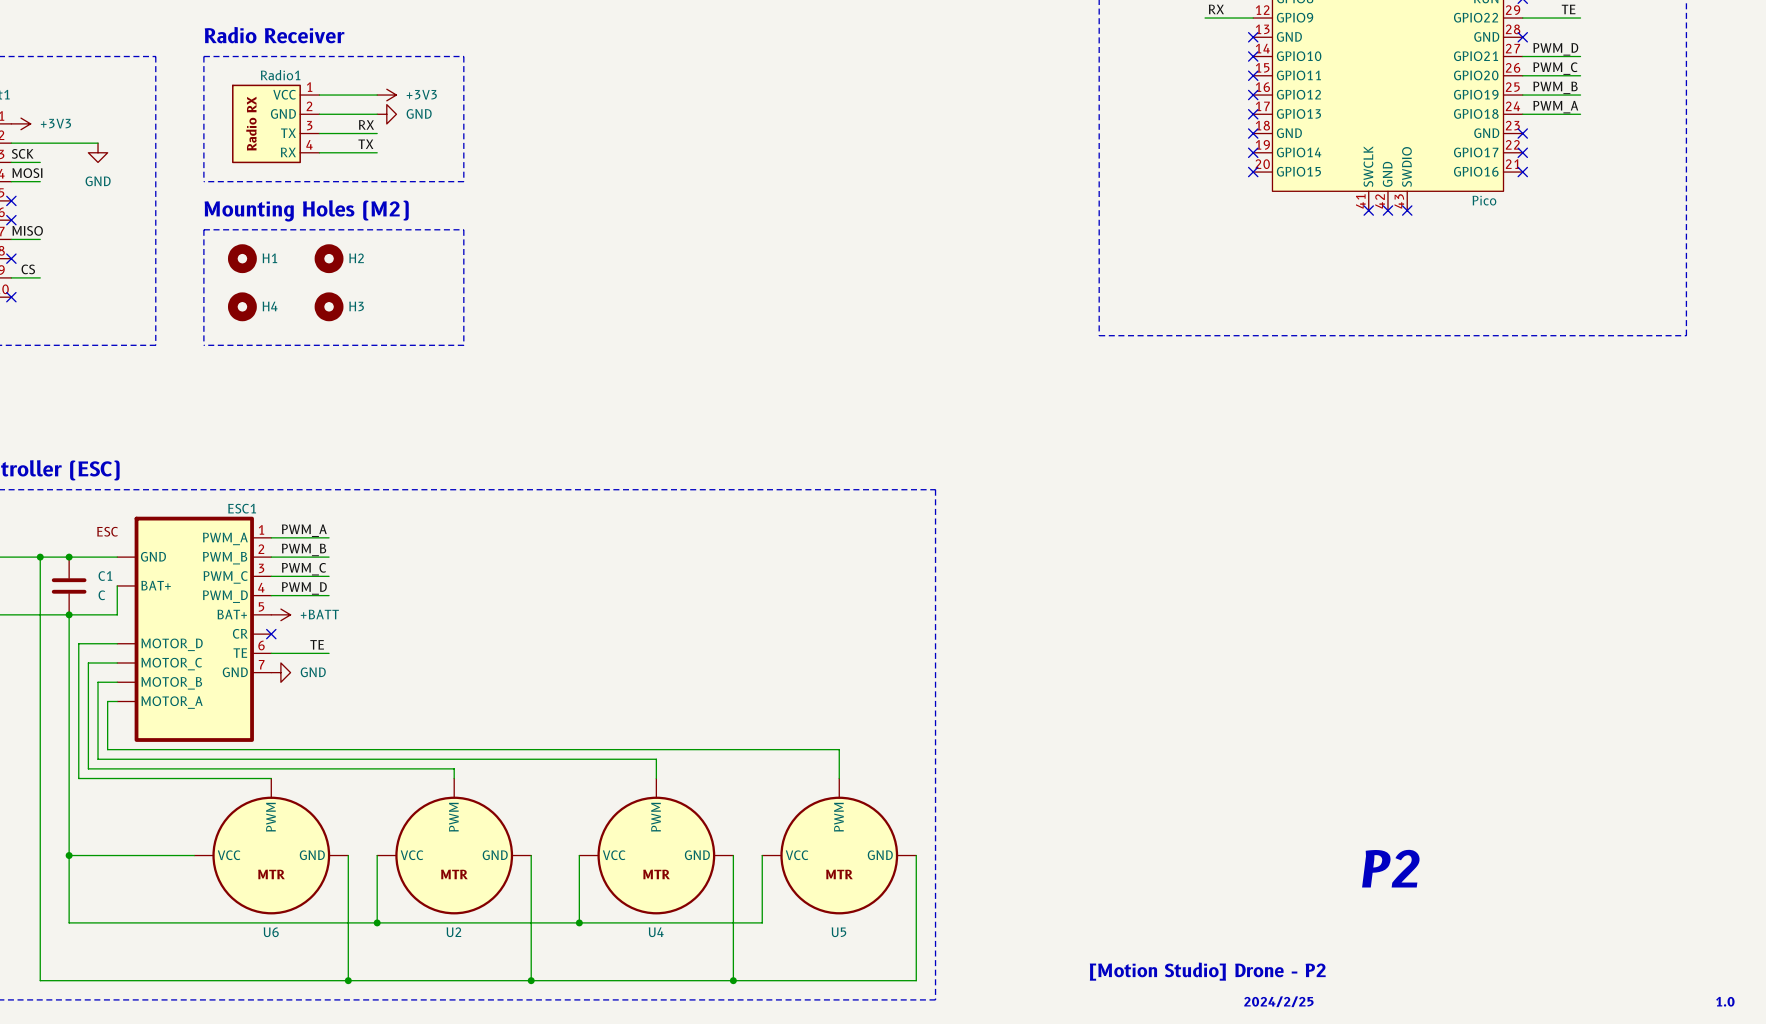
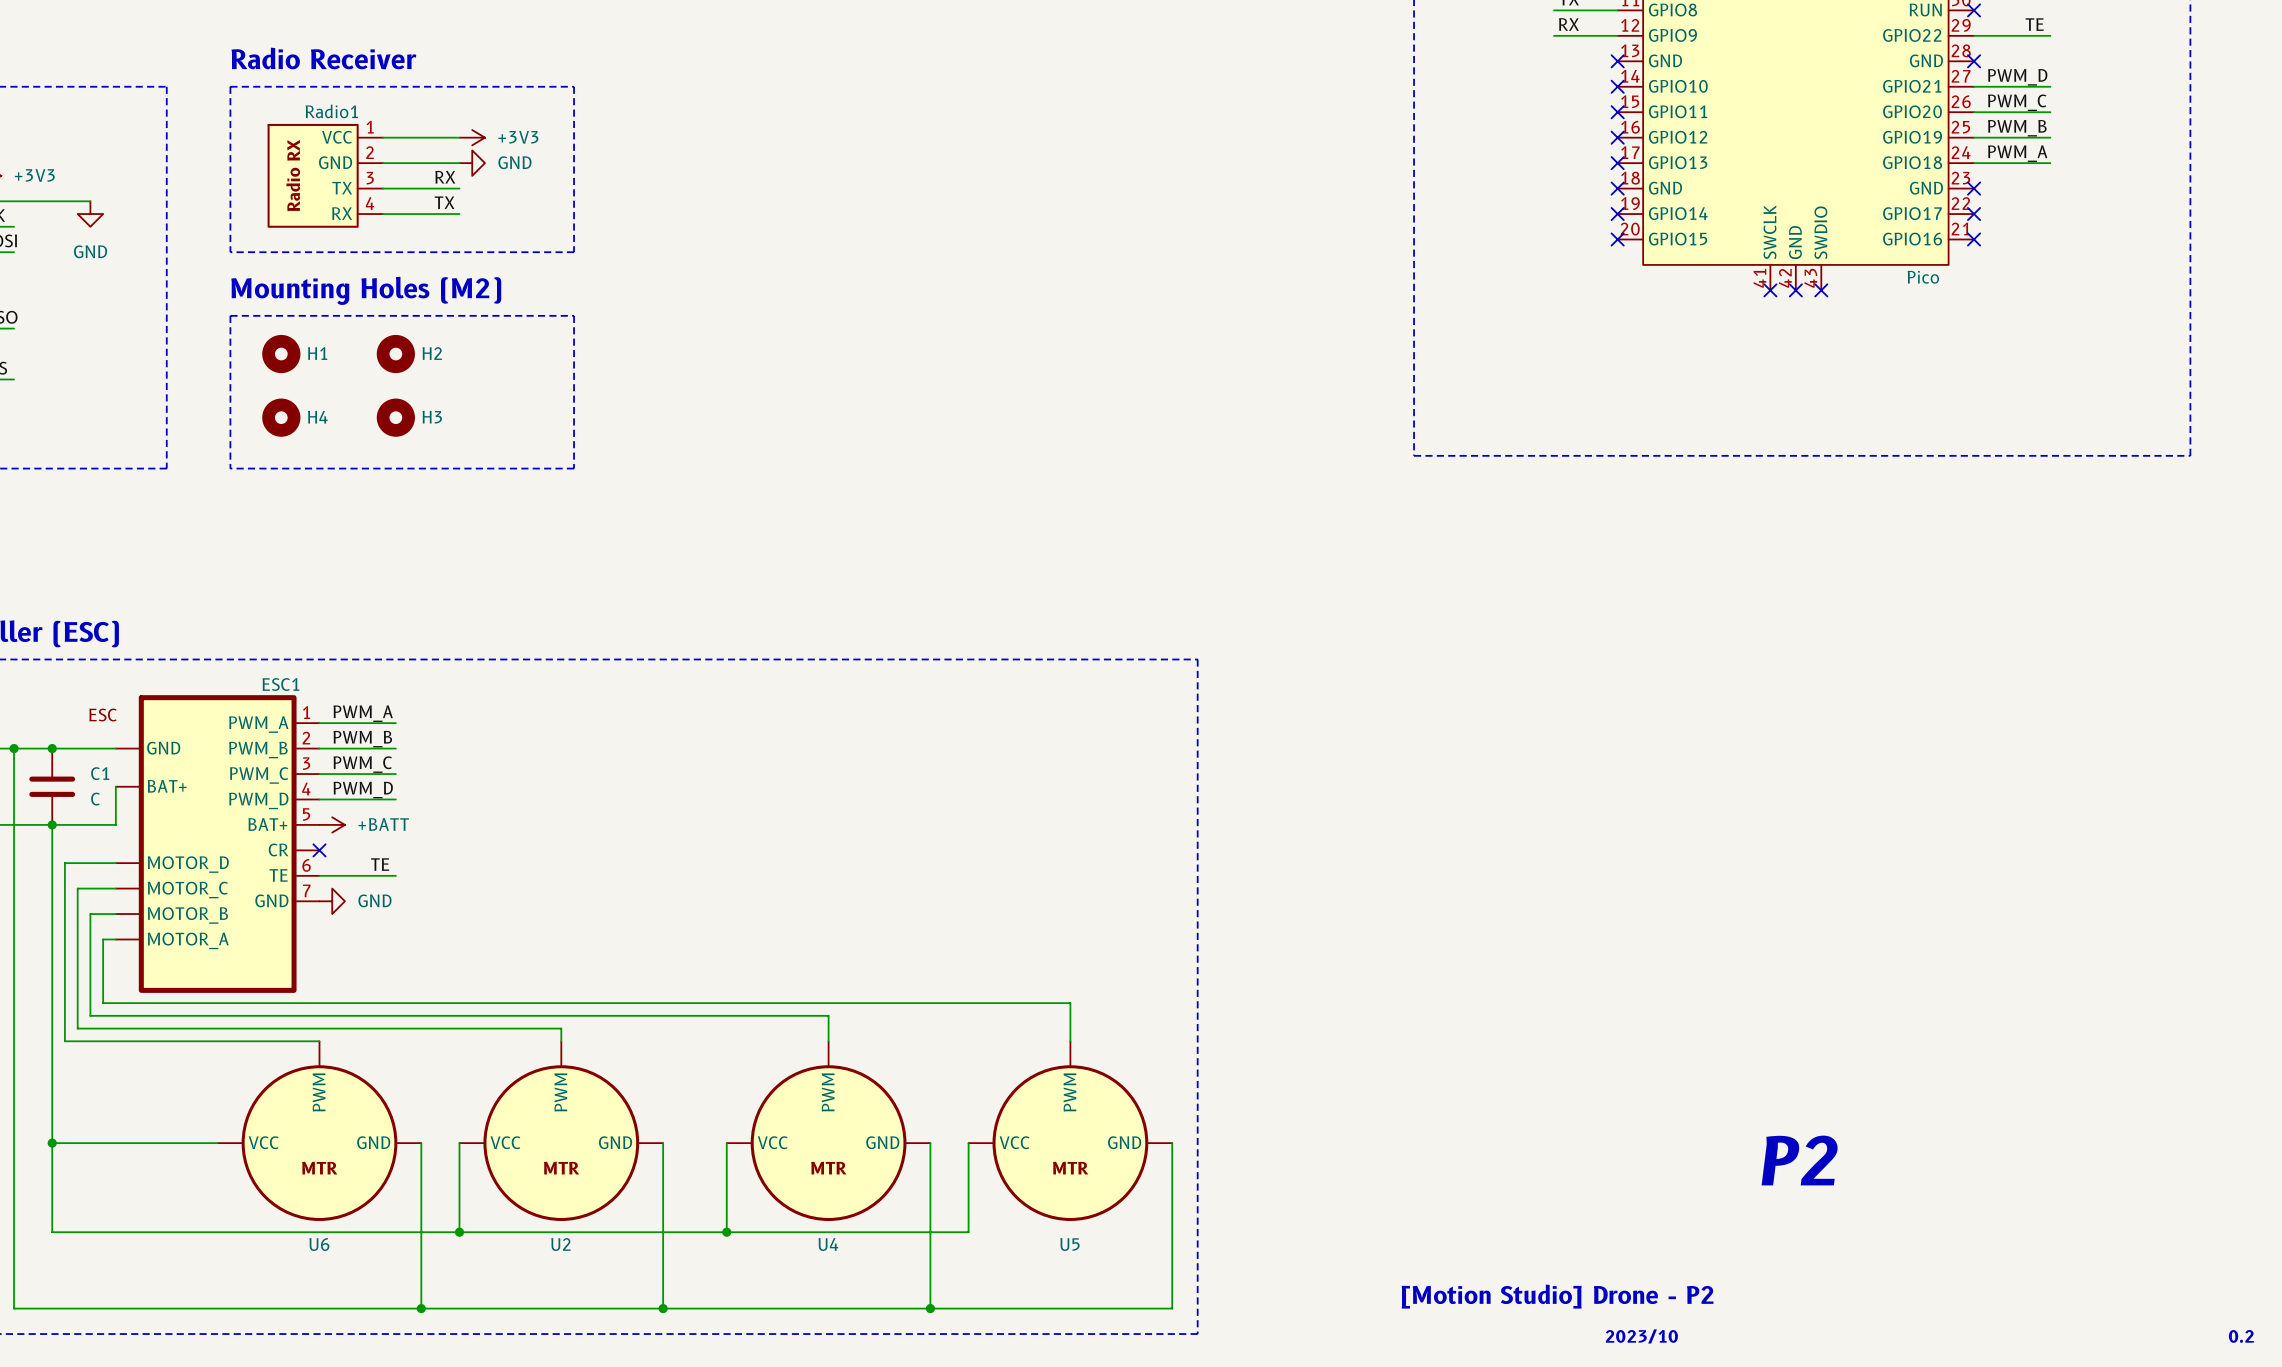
text: 2024/2/25 (1278, 1001) -> 2023/10 (1641, 1336)
text: 1.0 (1725, 1001) -> 0.2 (2241, 1336)

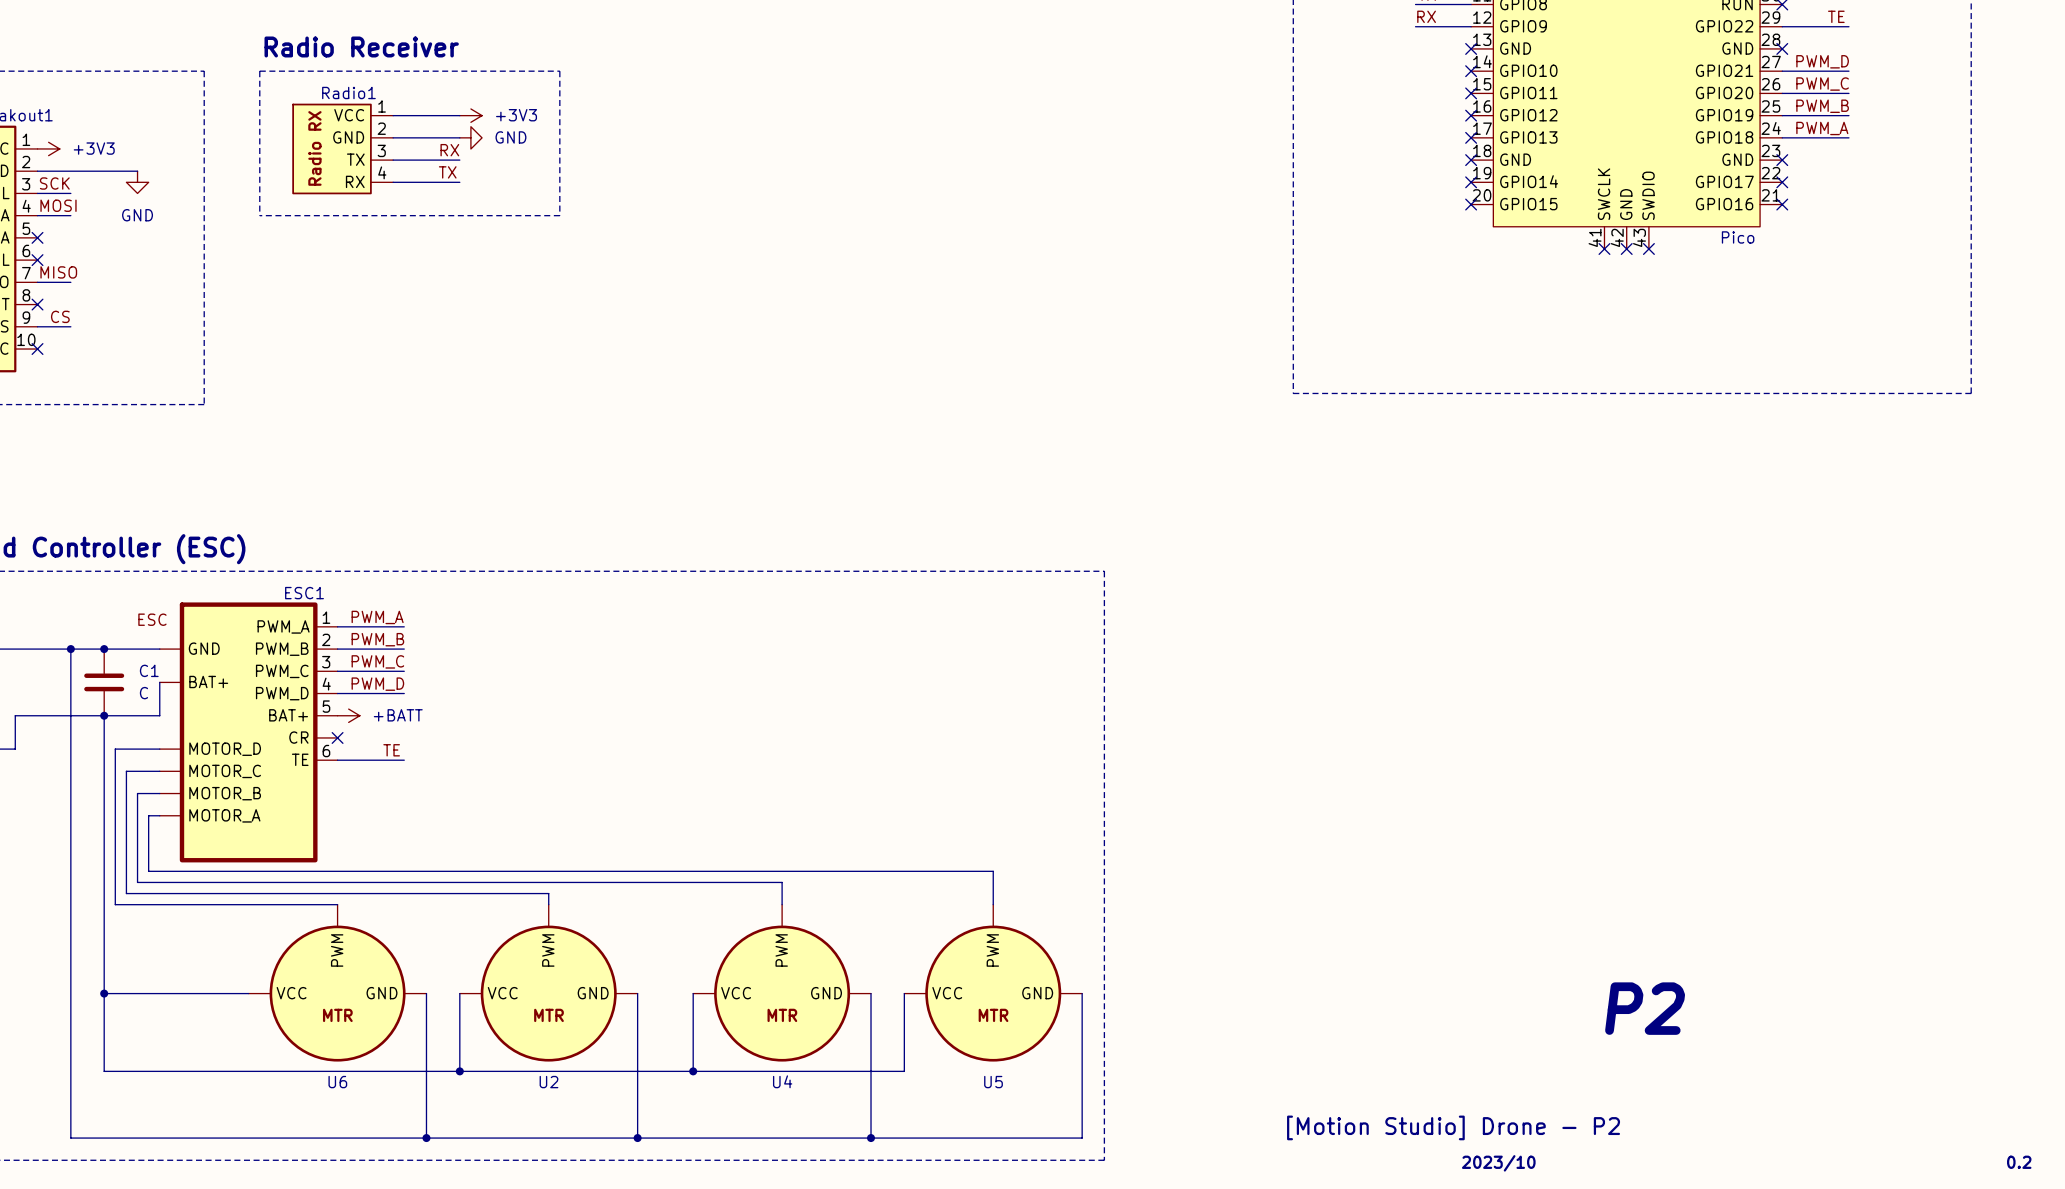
text: Mounting Holes (M2) (366, 290) -> none
line: (230, 315) (574, 315) (574, 468) (230, 468) (230, 315) -> none
H1: (281, 354) -> none
H2: (395, 354) -> none
H4: (281, 417) -> none
H3: (395, 417) -> none
ESC1 symbol: [77, 695, 320, 993] -> [126, 602, 338, 863]
power symbol: GND (332, 901) -> none

